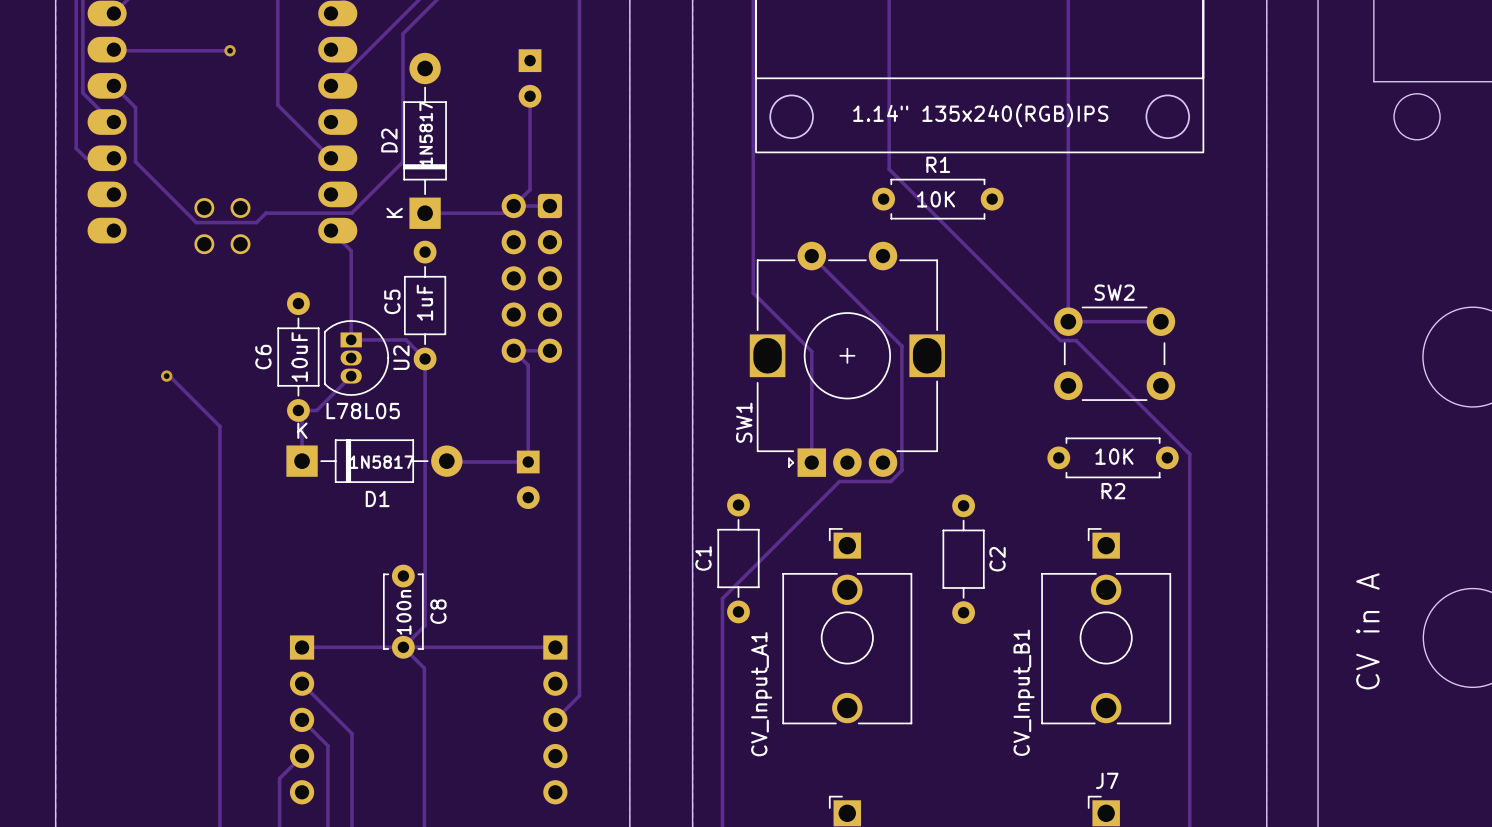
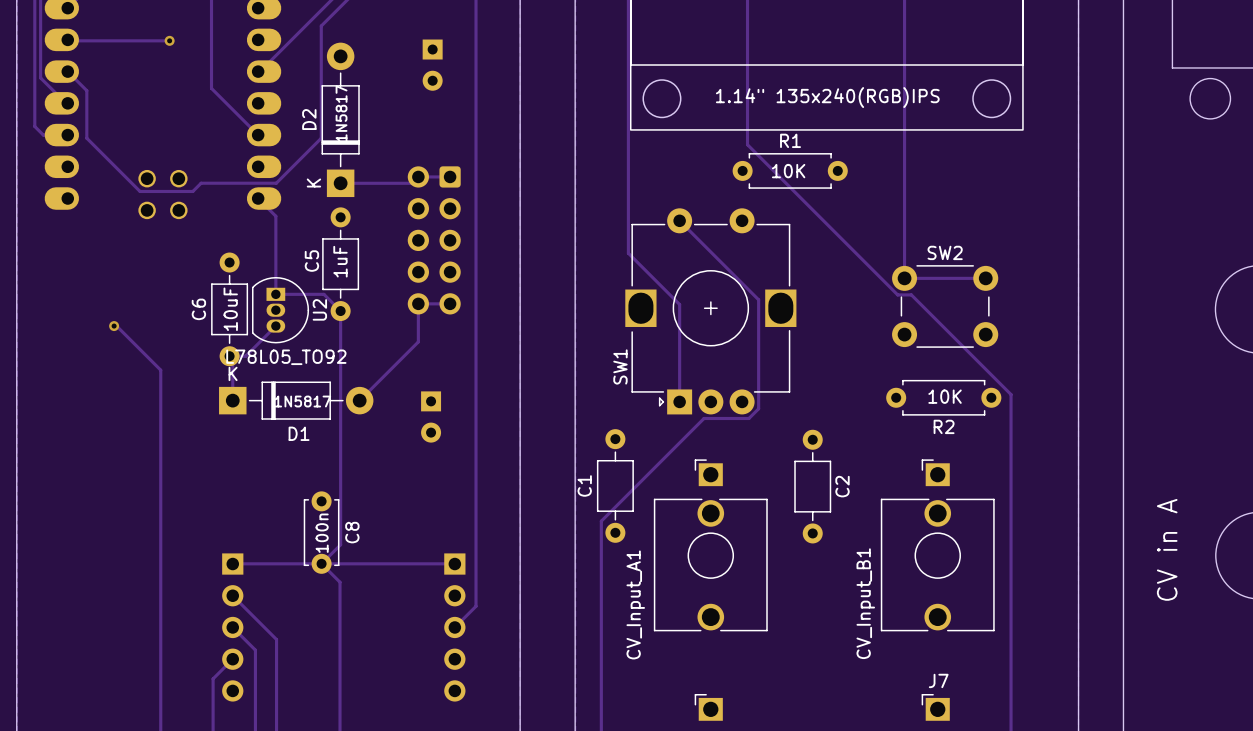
track: (530, 96) (530, 189) (506, 213) -> none
track: (513, 350) (528, 365) (528, 461) (446, 461) -> (418, 303) (418, 341) (359, 400)
U2 value: L78L05 (363, 411) -> L78L05_TO92 (286, 357)

